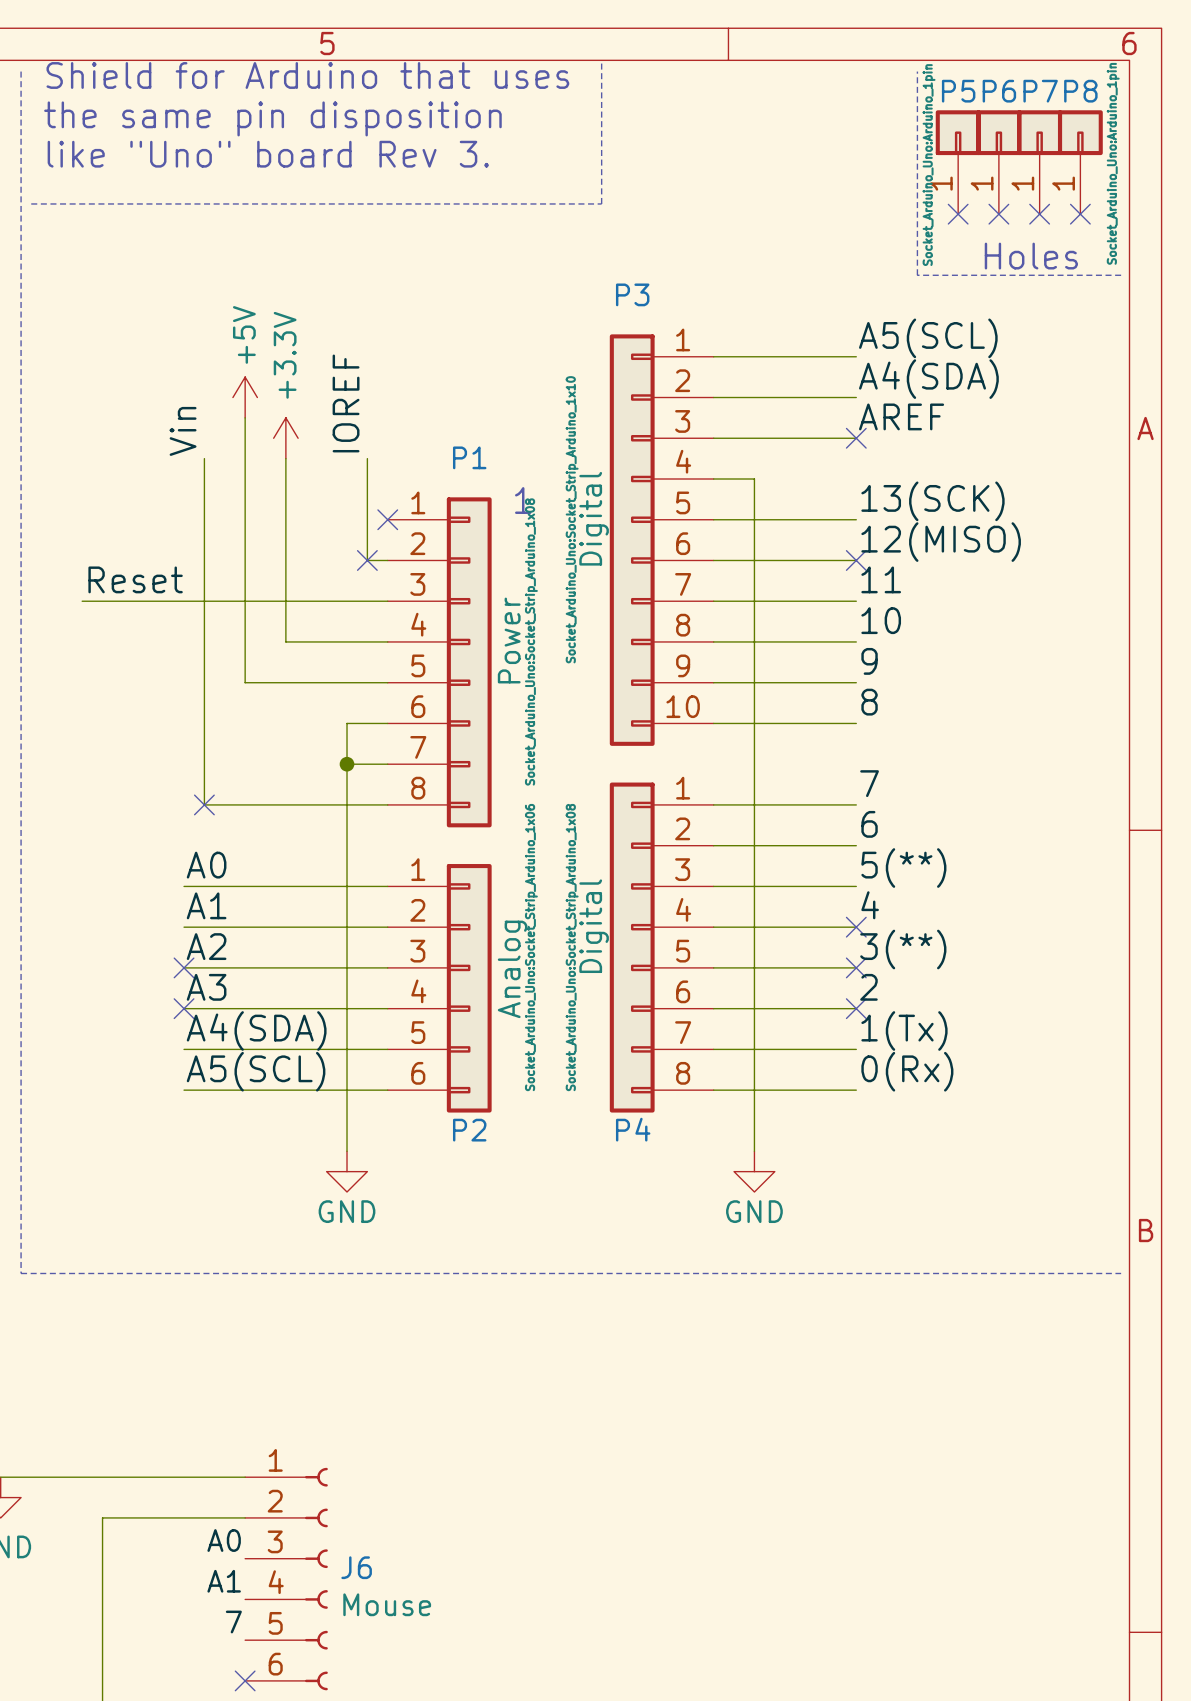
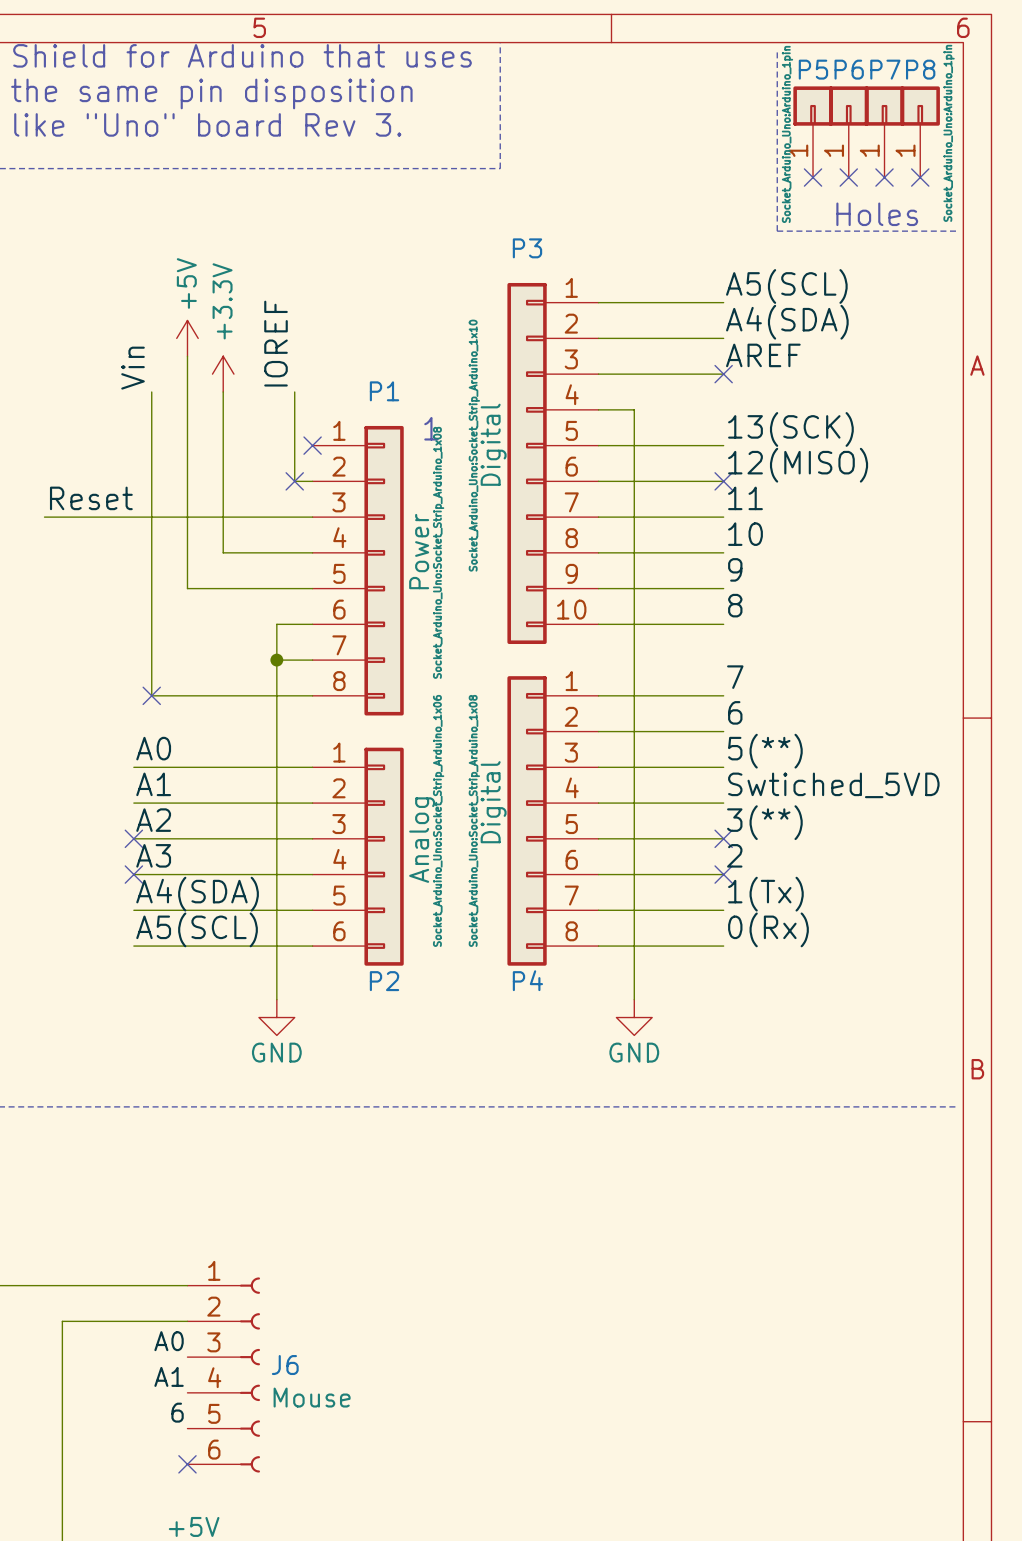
label: 4 (870, 905) -> Swtiched_5VD (833, 785)
no-connect mark: (856, 927) -> none
label: 7 (233, 1622) -> 6 (177, 1412)

